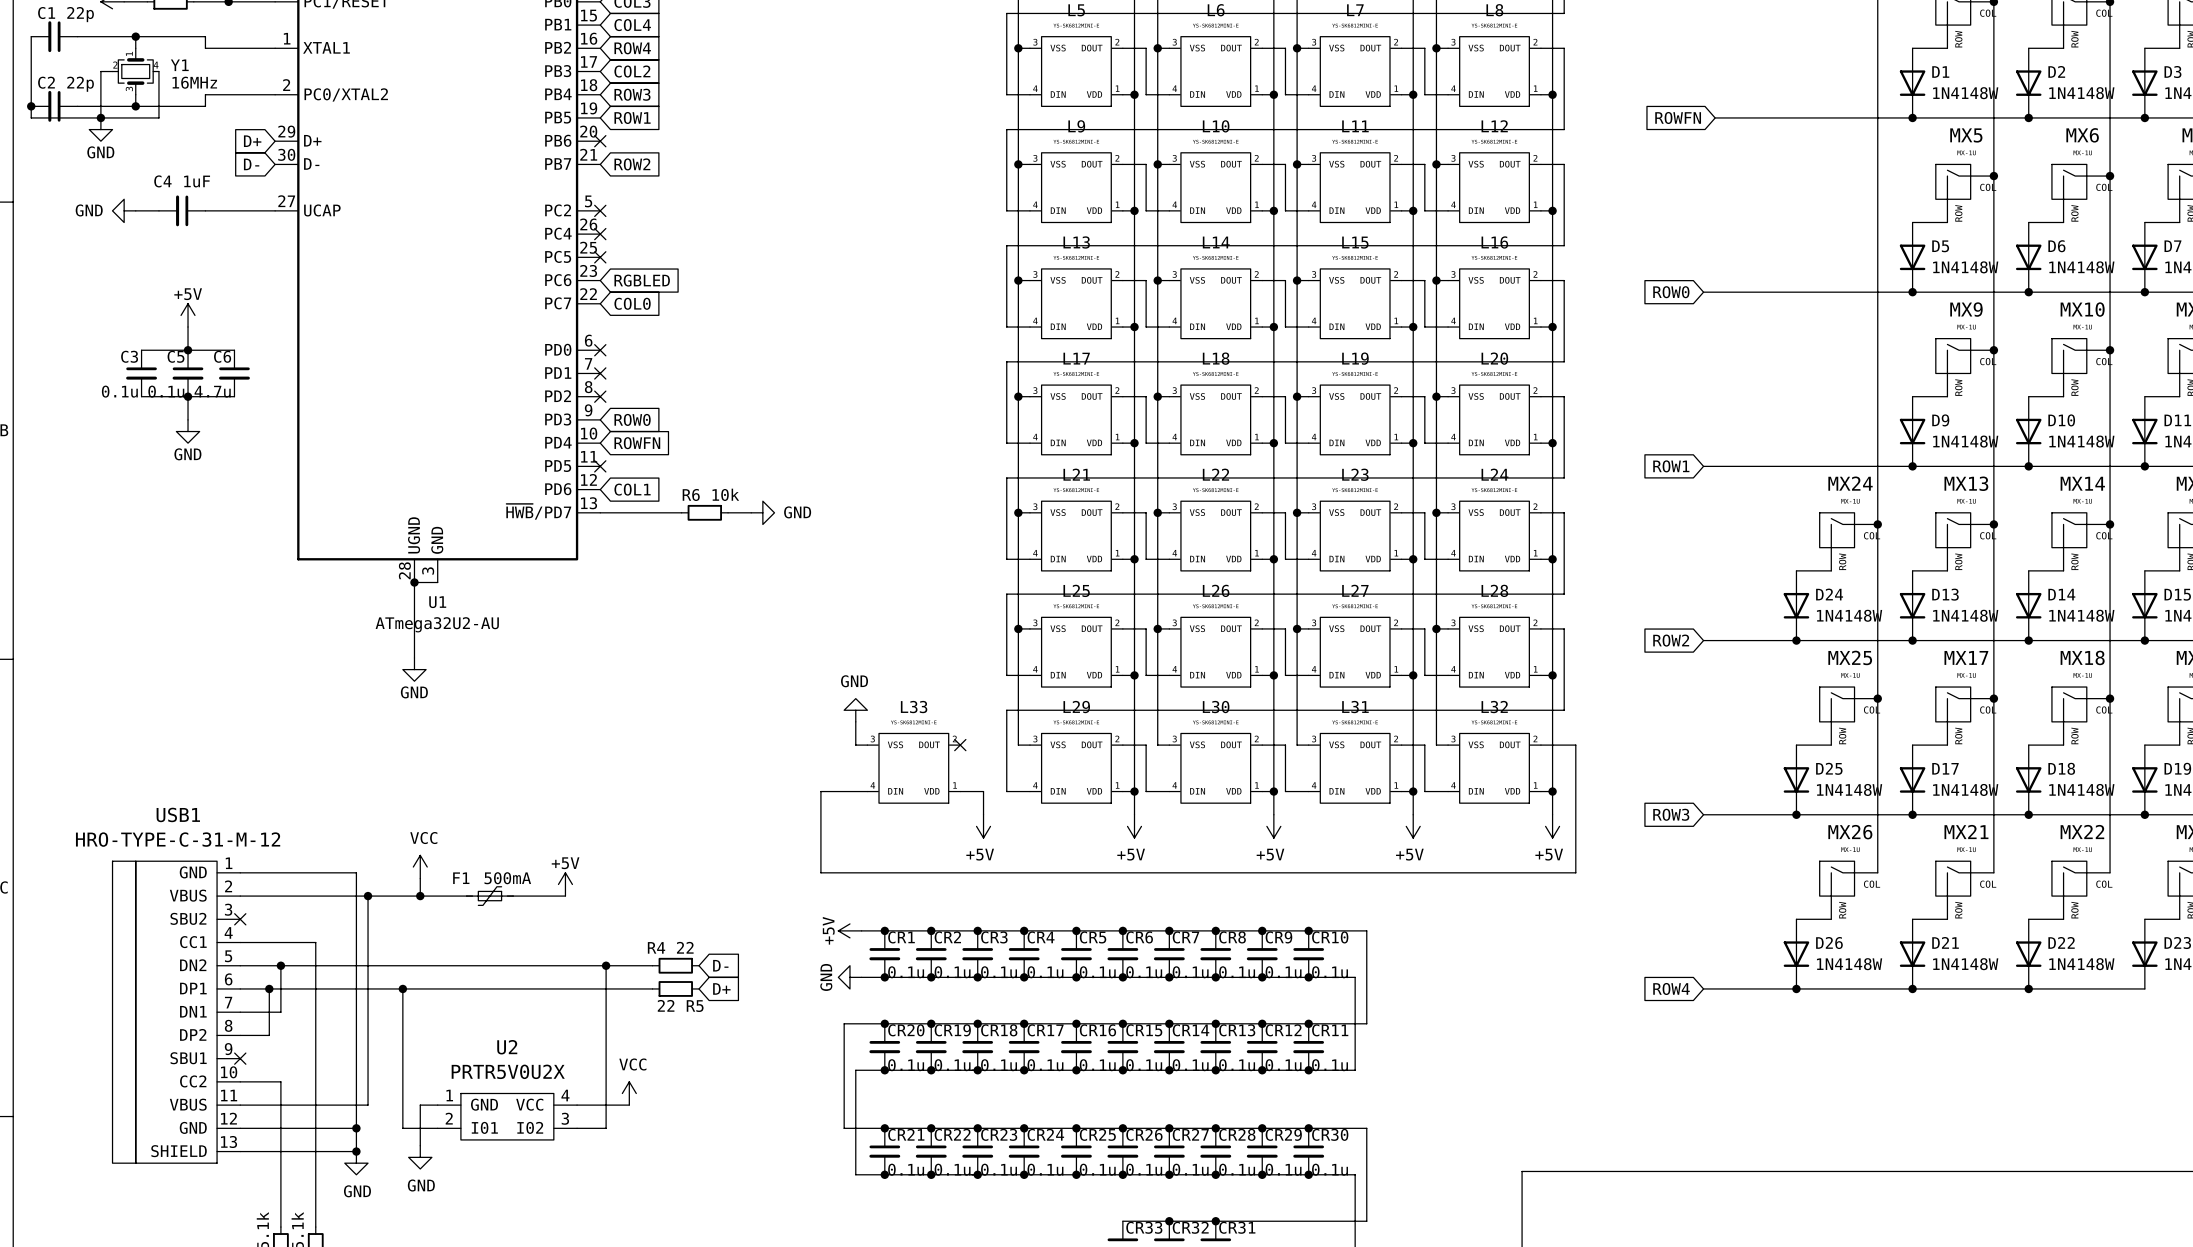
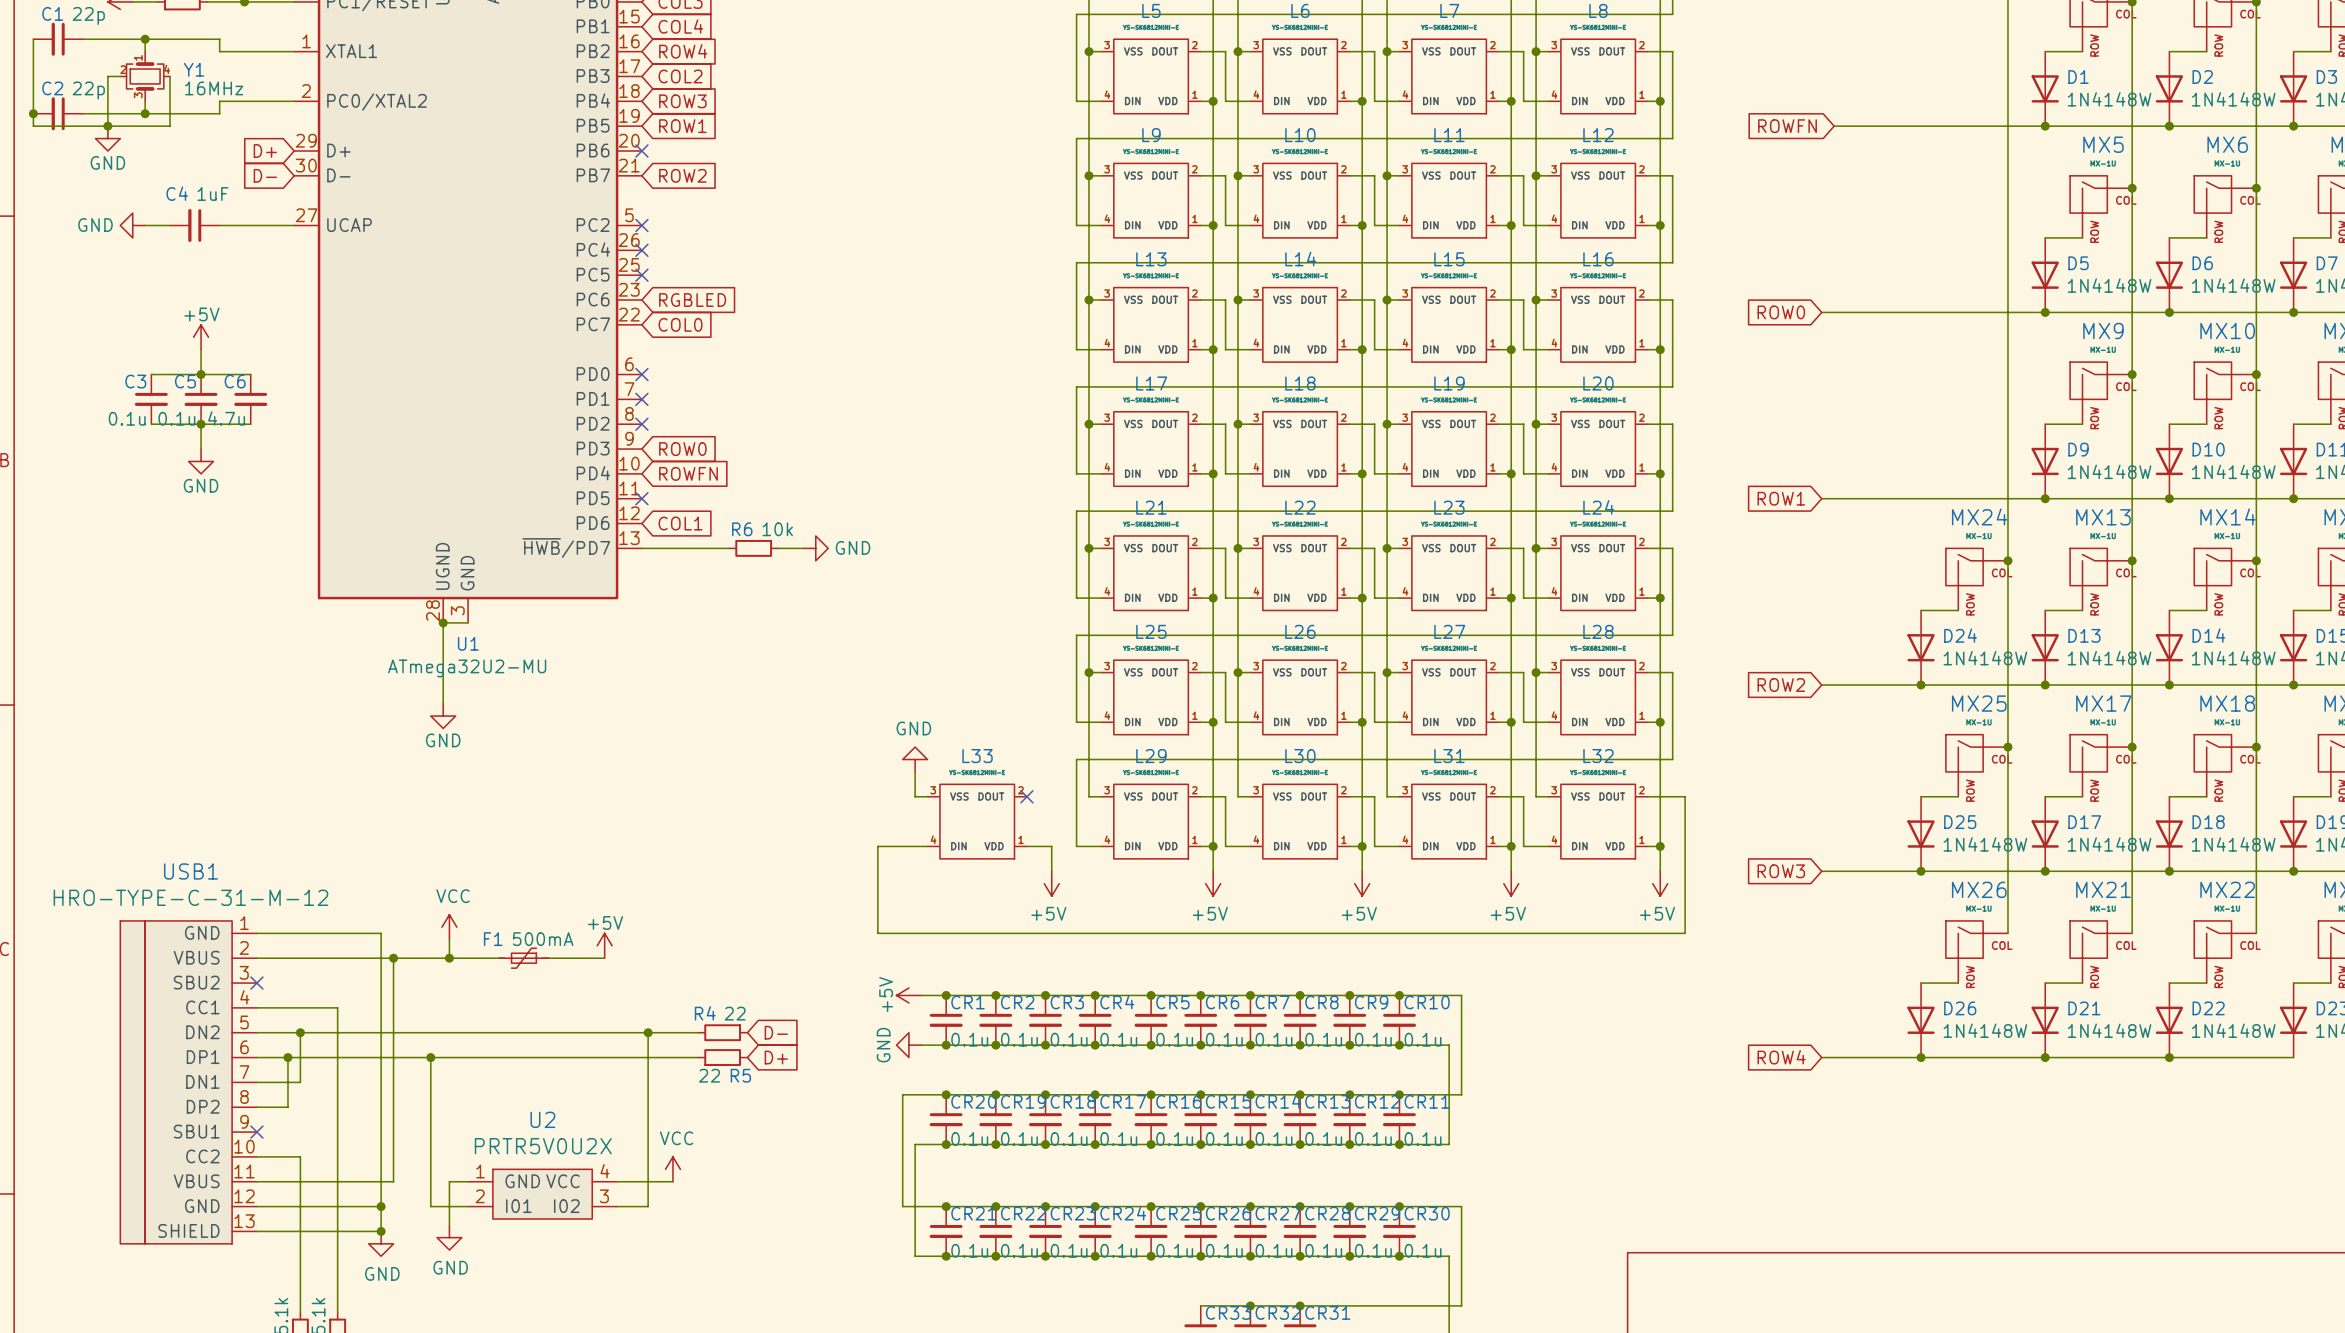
U1 value: ATmega32U2-AU (437, 624) -> ATmega32U2-MU (467, 668)

